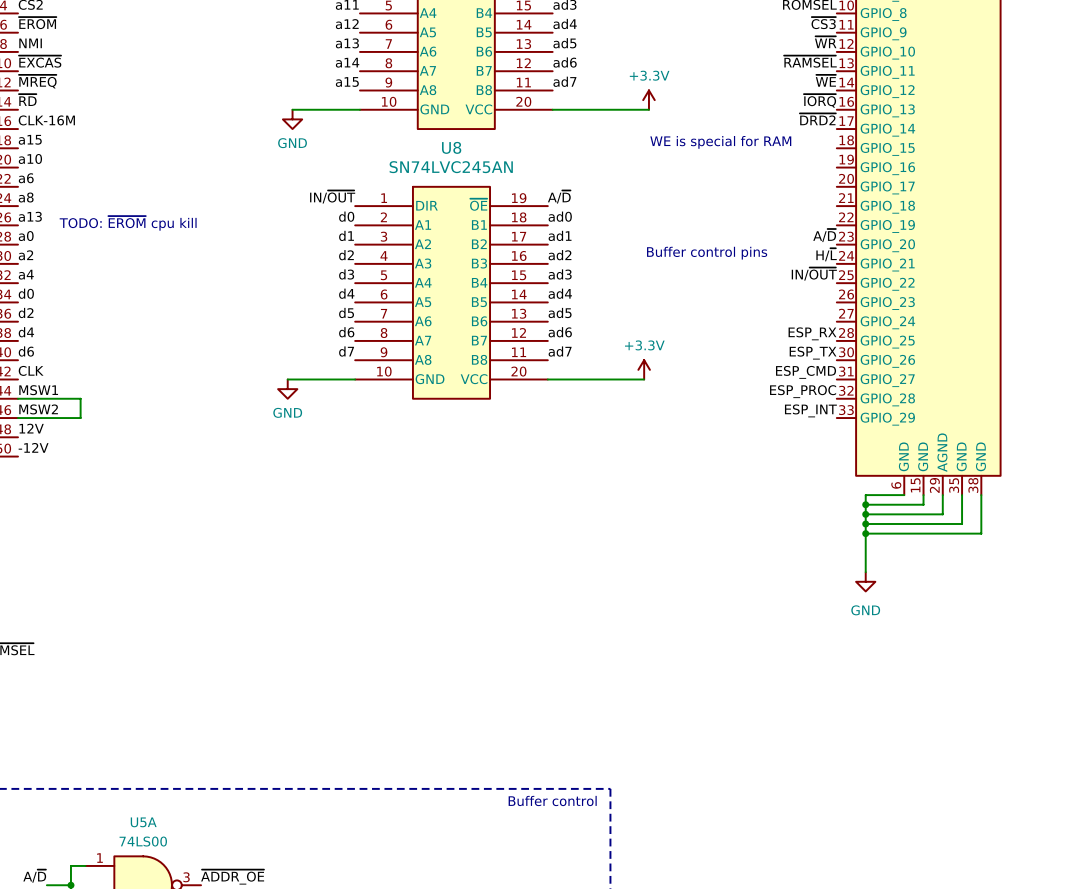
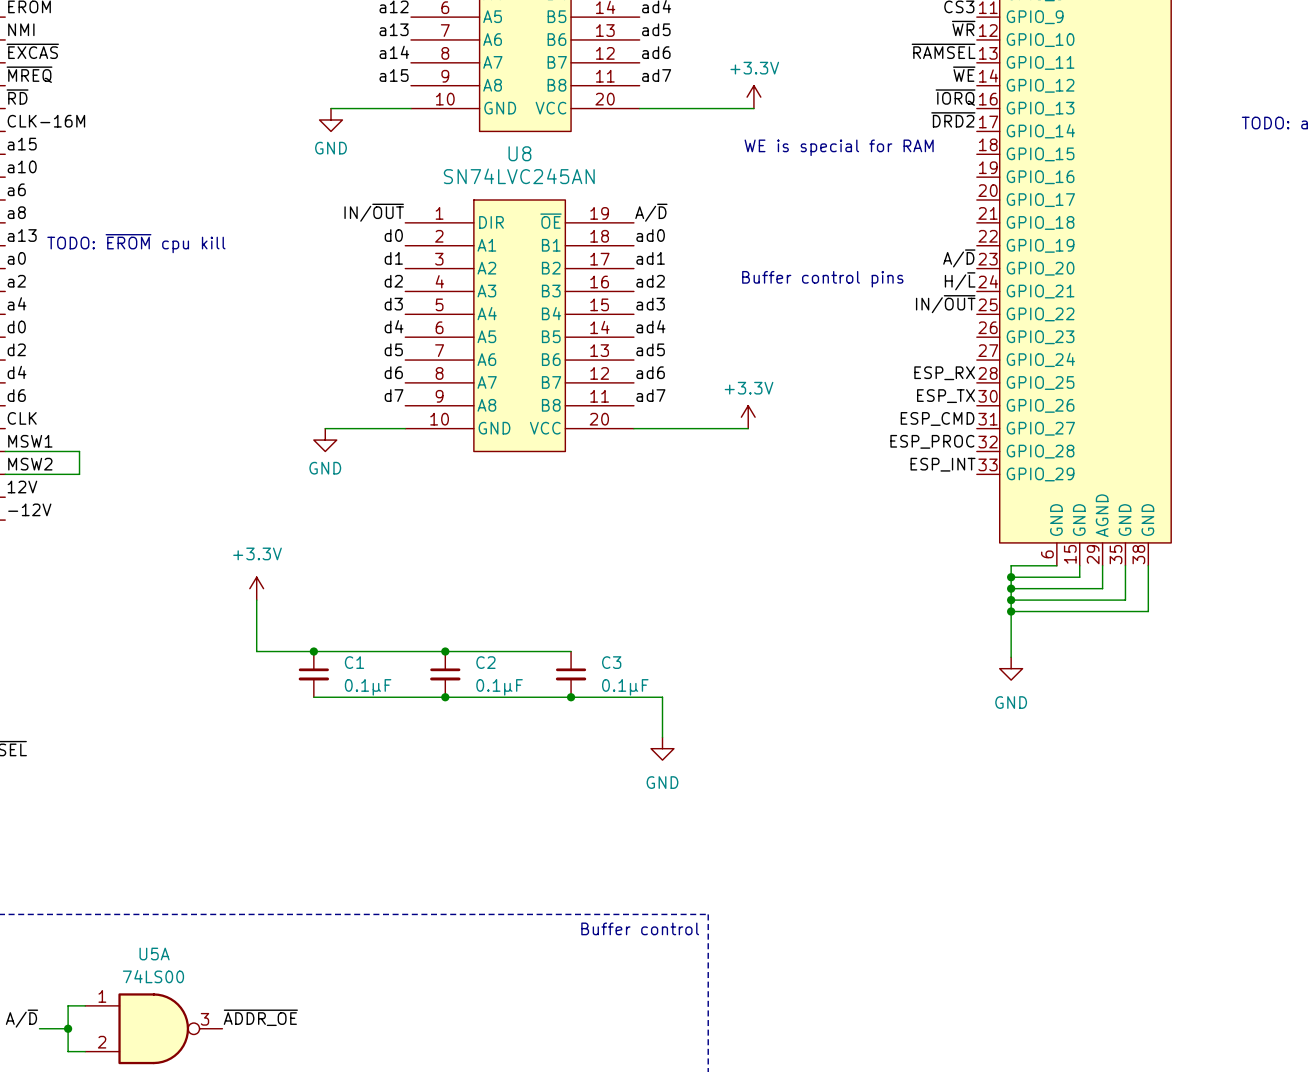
power symbol: none -> +3.3V (256, 588)
wire: none -> (256, 600) (256, 651) (571, 651)
junction: none -> (313, 651)
junction: none -> (445, 651)
C1: none -> 0.1µF (313, 674)
C2: none -> 0.1µF (445, 674)
C3: none -> 0.1µF (571, 674)
wire: none -> (313, 697) (662, 697) (662, 737)
junction: none -> (445, 697)
junction: none -> (571, 697)
power symbol: none -> GND (662, 748)

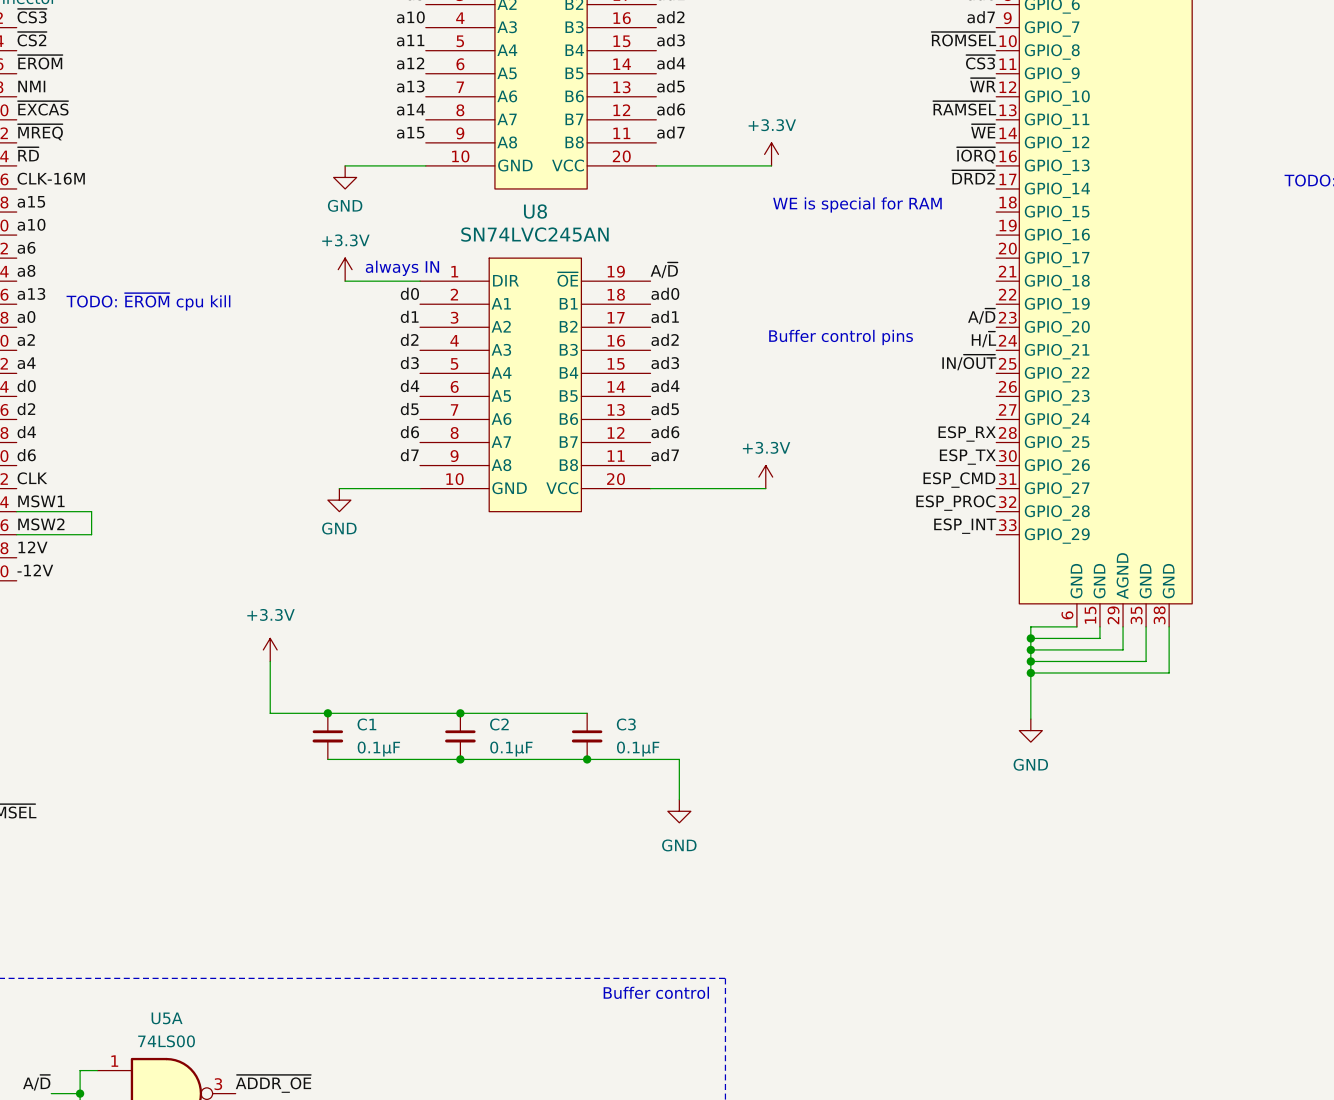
text: none -> always IN (402, 268)
power symbol: none -> +3.3V (345, 269)
label: IN/~{OUT} (374, 212) -> none
wire: none -> (345, 281) (420, 281)

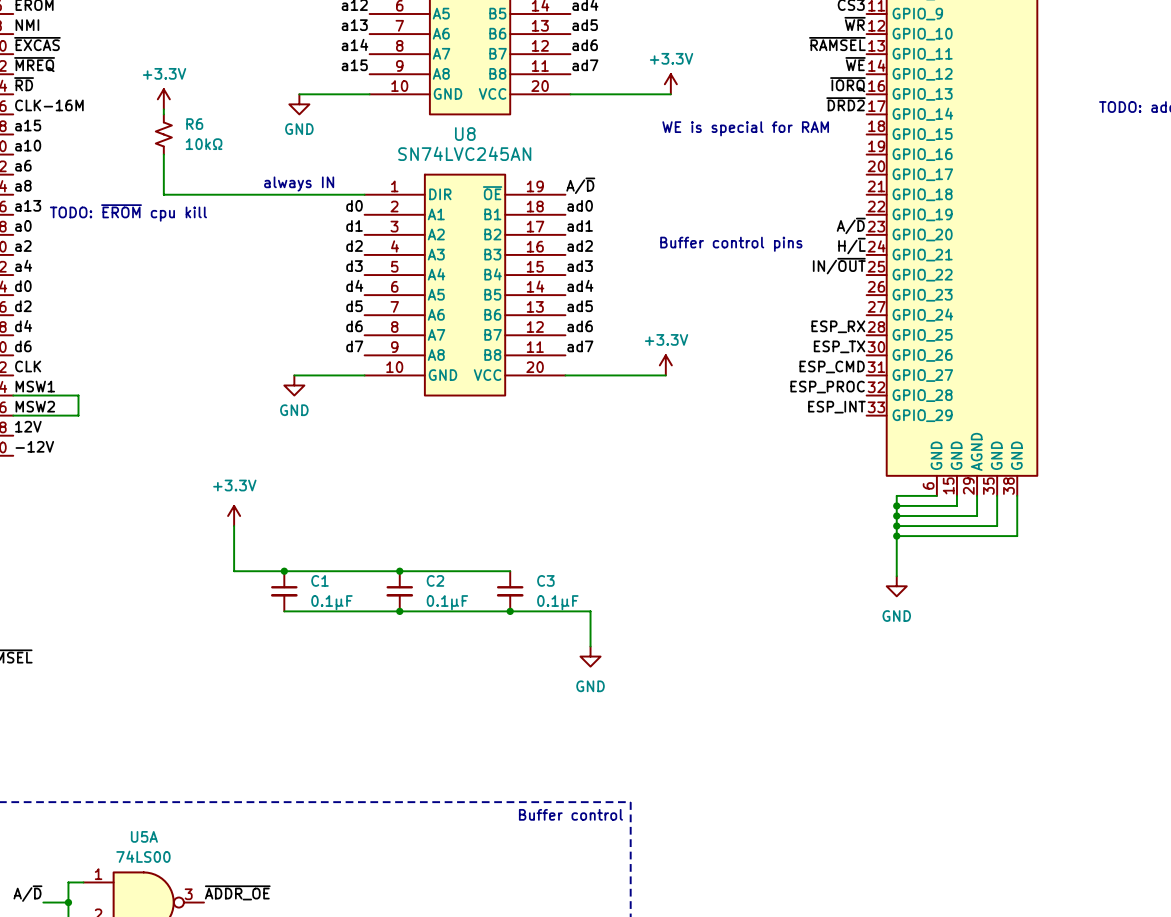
wire: none -> (163, 109) (163, 114)
R6: none -> 10kΩ (163, 134)
wire: none -> (163, 154) (163, 194) (299, 194)
text position: always IN (402, 268) -> always IN (299, 184)
power symbol position: +3.3V (345, 269) -> +3.3V (163, 99)

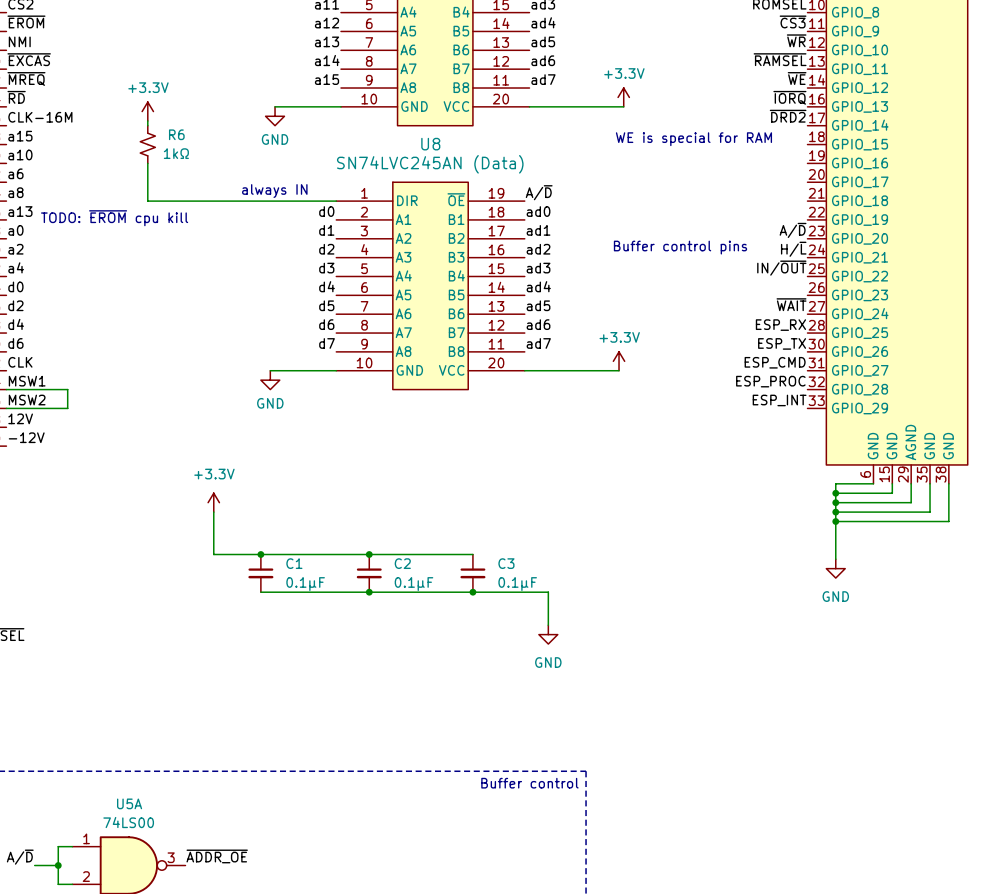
R6 value: 10kΩ (204, 144) -> 1kΩ (176, 153)
U8 value: SN74LVC245AN (464, 153) -> SN74LVC245AN (Data) (430, 164)
label: none -> ~{WAIT} (791, 304)

